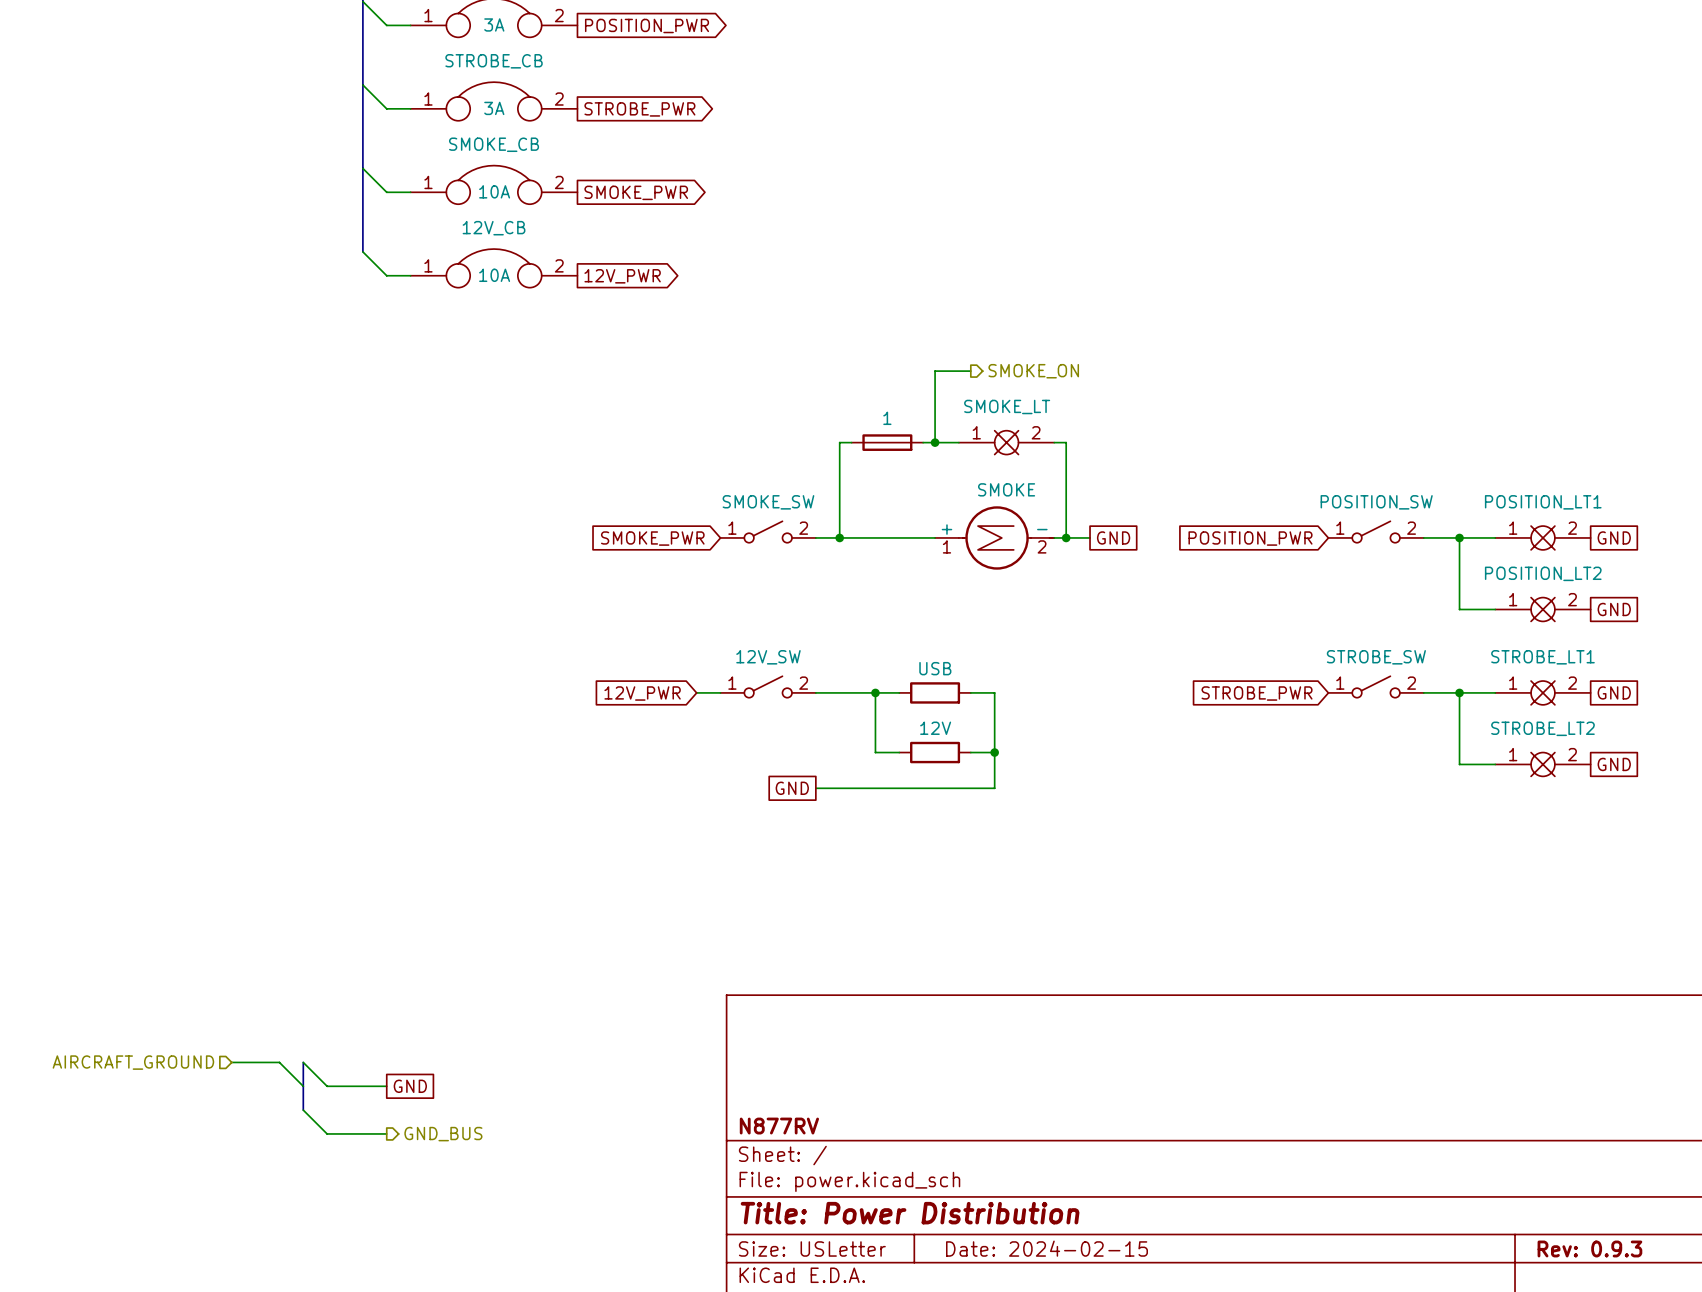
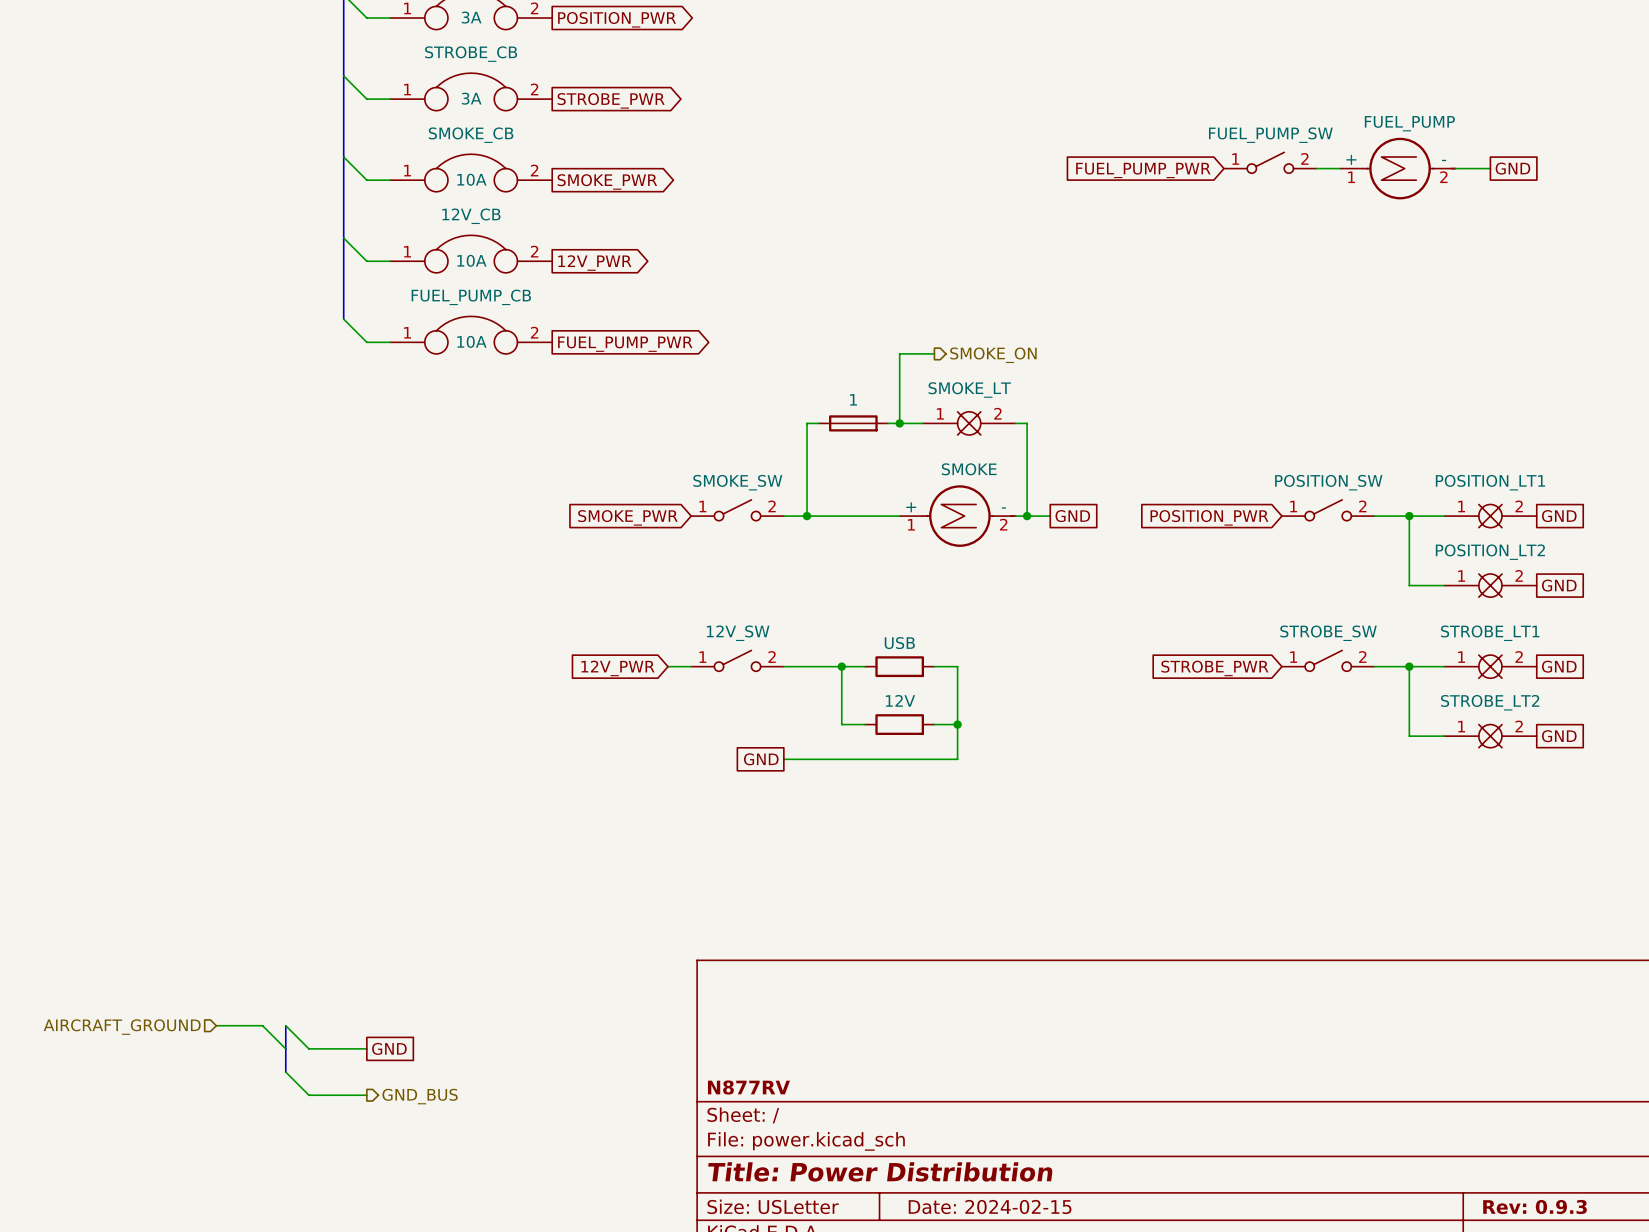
FUEL_PUMP_SW: none -> (1270, 162)
global label: none -> FUEL_PUMP_PWR (1143, 170)
wire: none -> (1316, 168) (1339, 168)
FUEL_PUMP: none -> (1397, 168)
wire: none -> (1455, 168) (1490, 168)
global label: none -> GND (1512, 168)
bus: none -> (343, 238) (343, 319)
wire: none -> (343, 319) (366, 342) (390, 342)
FUEL_PUMP_CB: none -> 10A (471, 335)
global label: none -> FUEL_PUMP_PWR (625, 344)

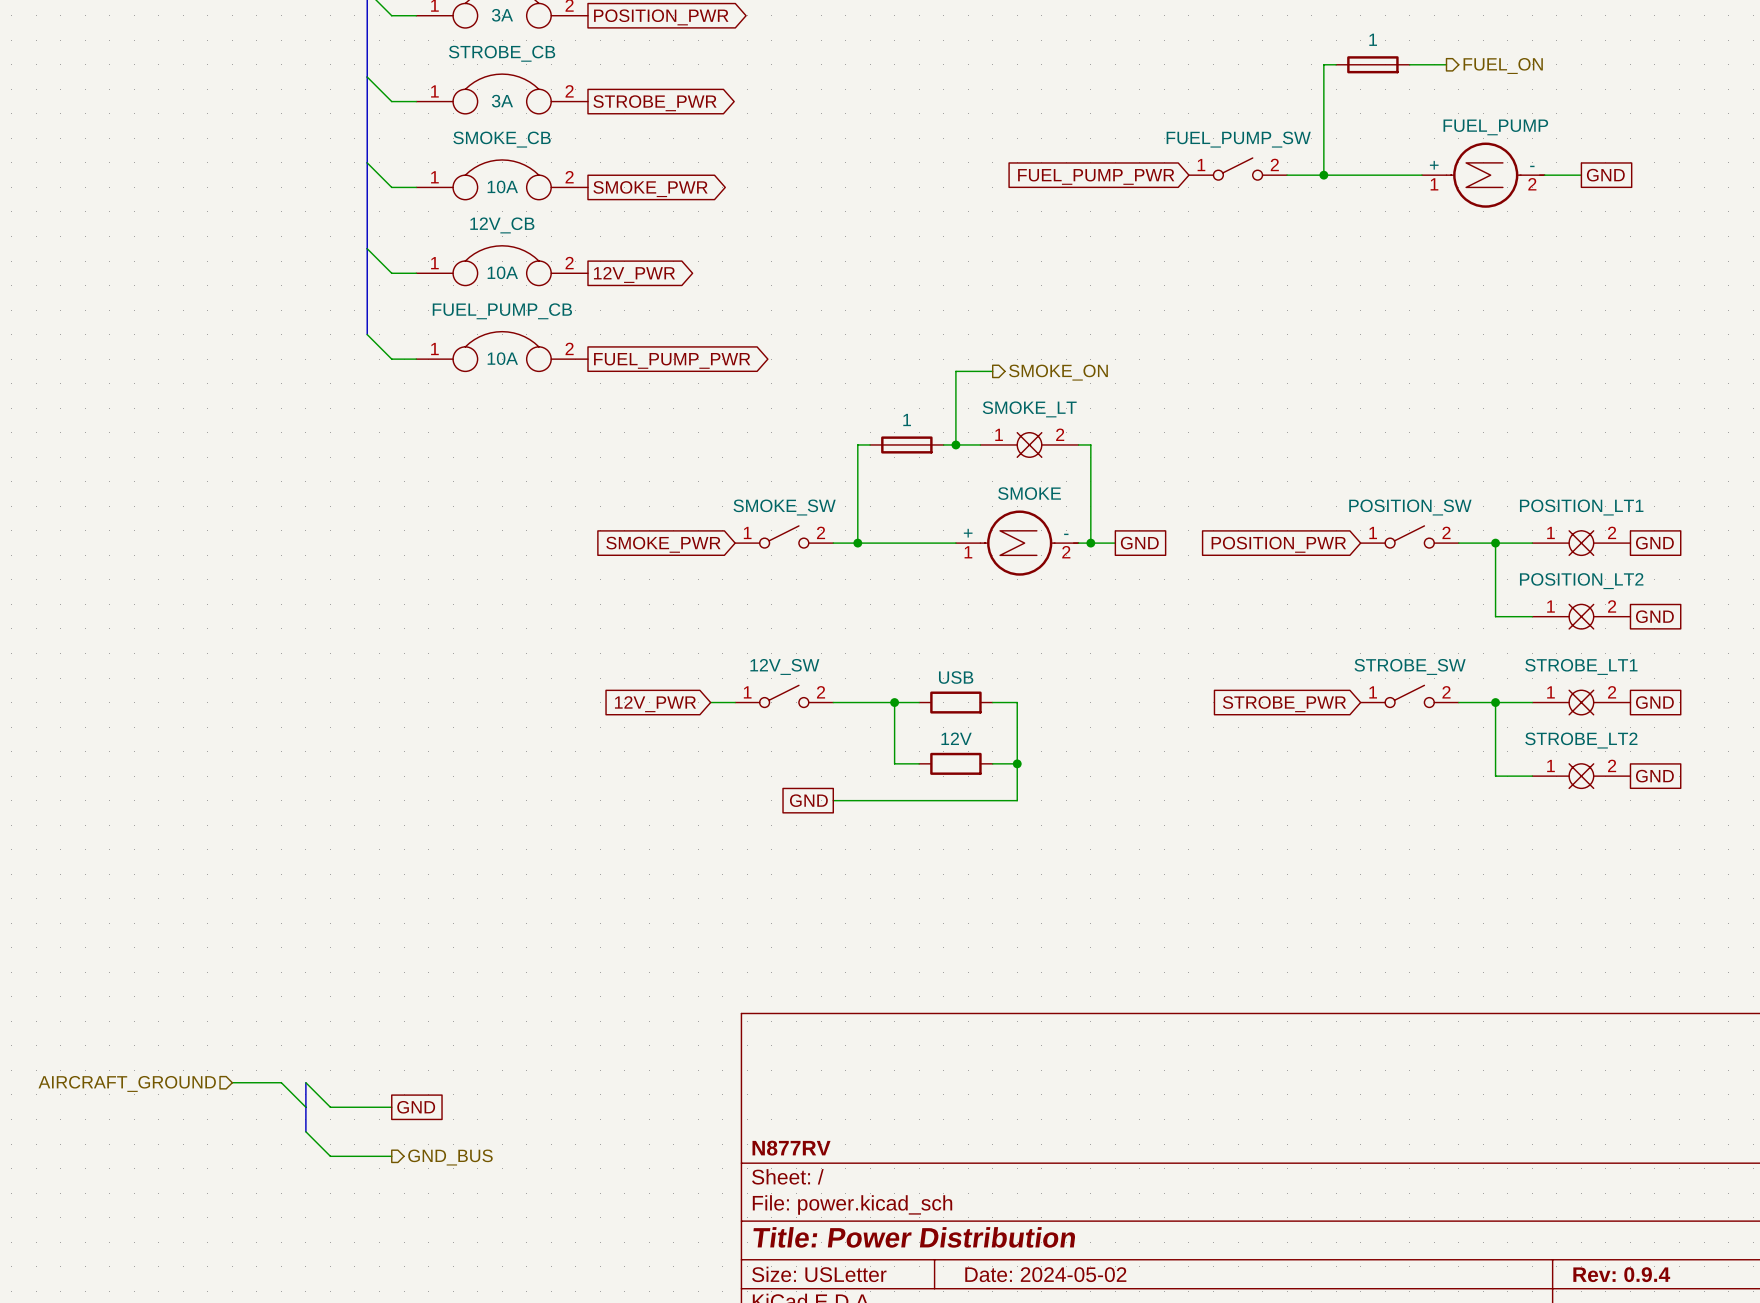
wire: none -> (1336, 64) (1323, 64) (1323, 175)
part: none -> 1 (1372, 64)
wire: none -> (1409, 64) (1446, 64)
hierarchical label: none -> FUEL_ON (1503, 66)
FUEL_PUMP_SW position: (1270, 162) -> (1238, 169)
wire: none -> (1287, 175) (1397, 175)
junction: none -> (1323, 175)
global label position: FUEL_PUMP_PWR (1143, 170) -> FUEL_PUMP_PWR (1096, 176)
title block: Date: 2024-02-15 (990, 1206) -> Date: 2024-05-02 (1045, 1274)
title block: Rev: 0.9.3 (1535, 1206) -> Rev: 0.9.4 (1621, 1274)

